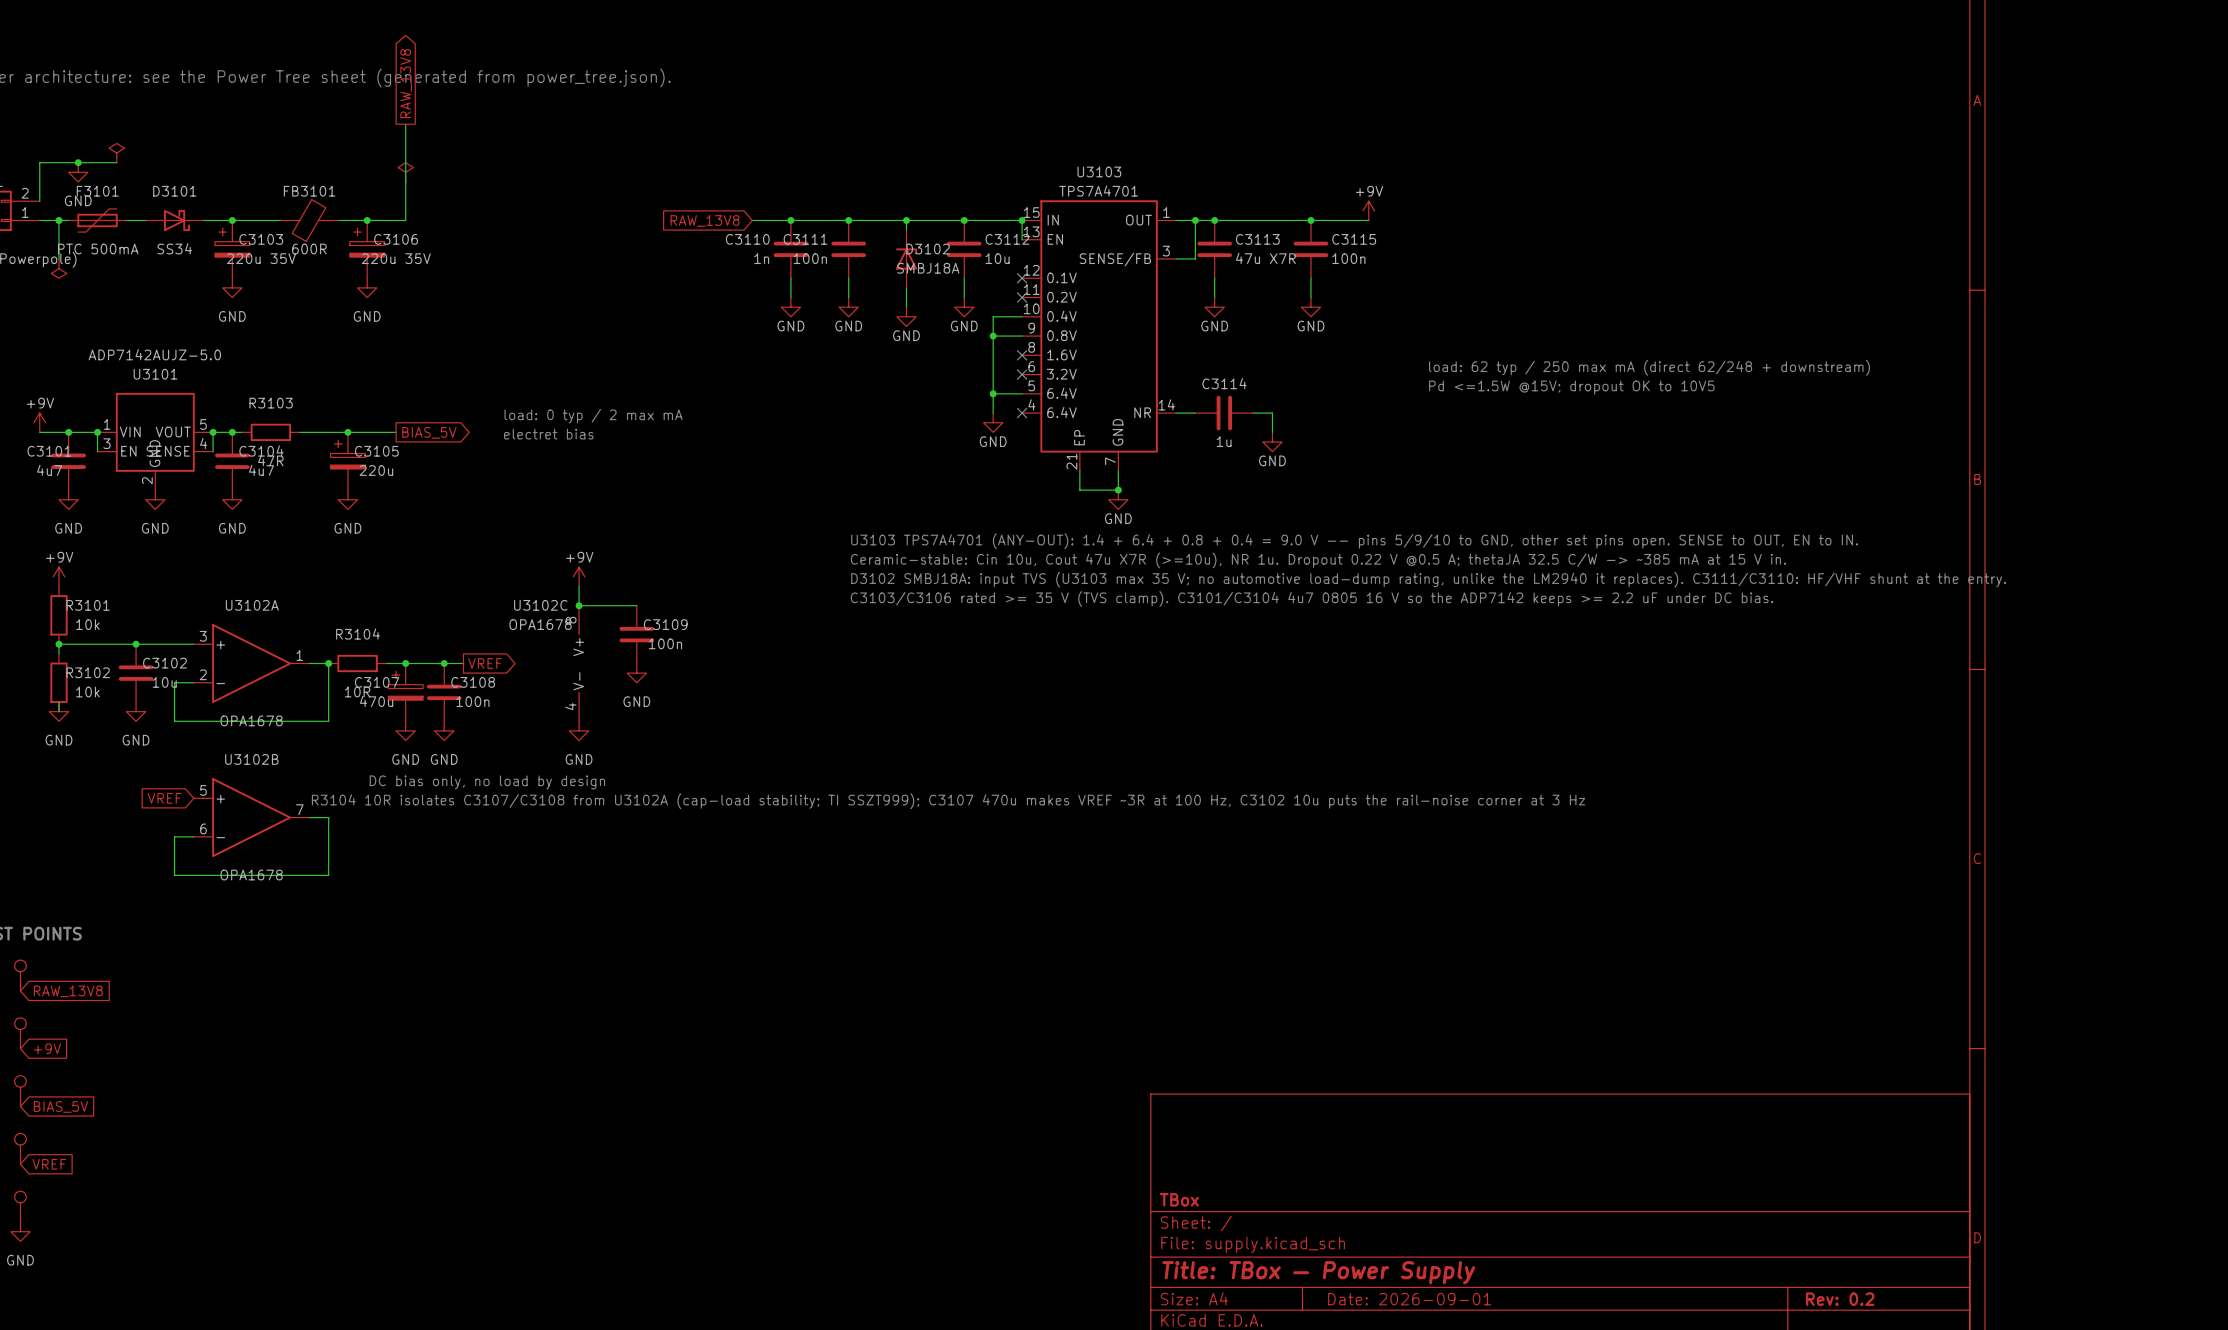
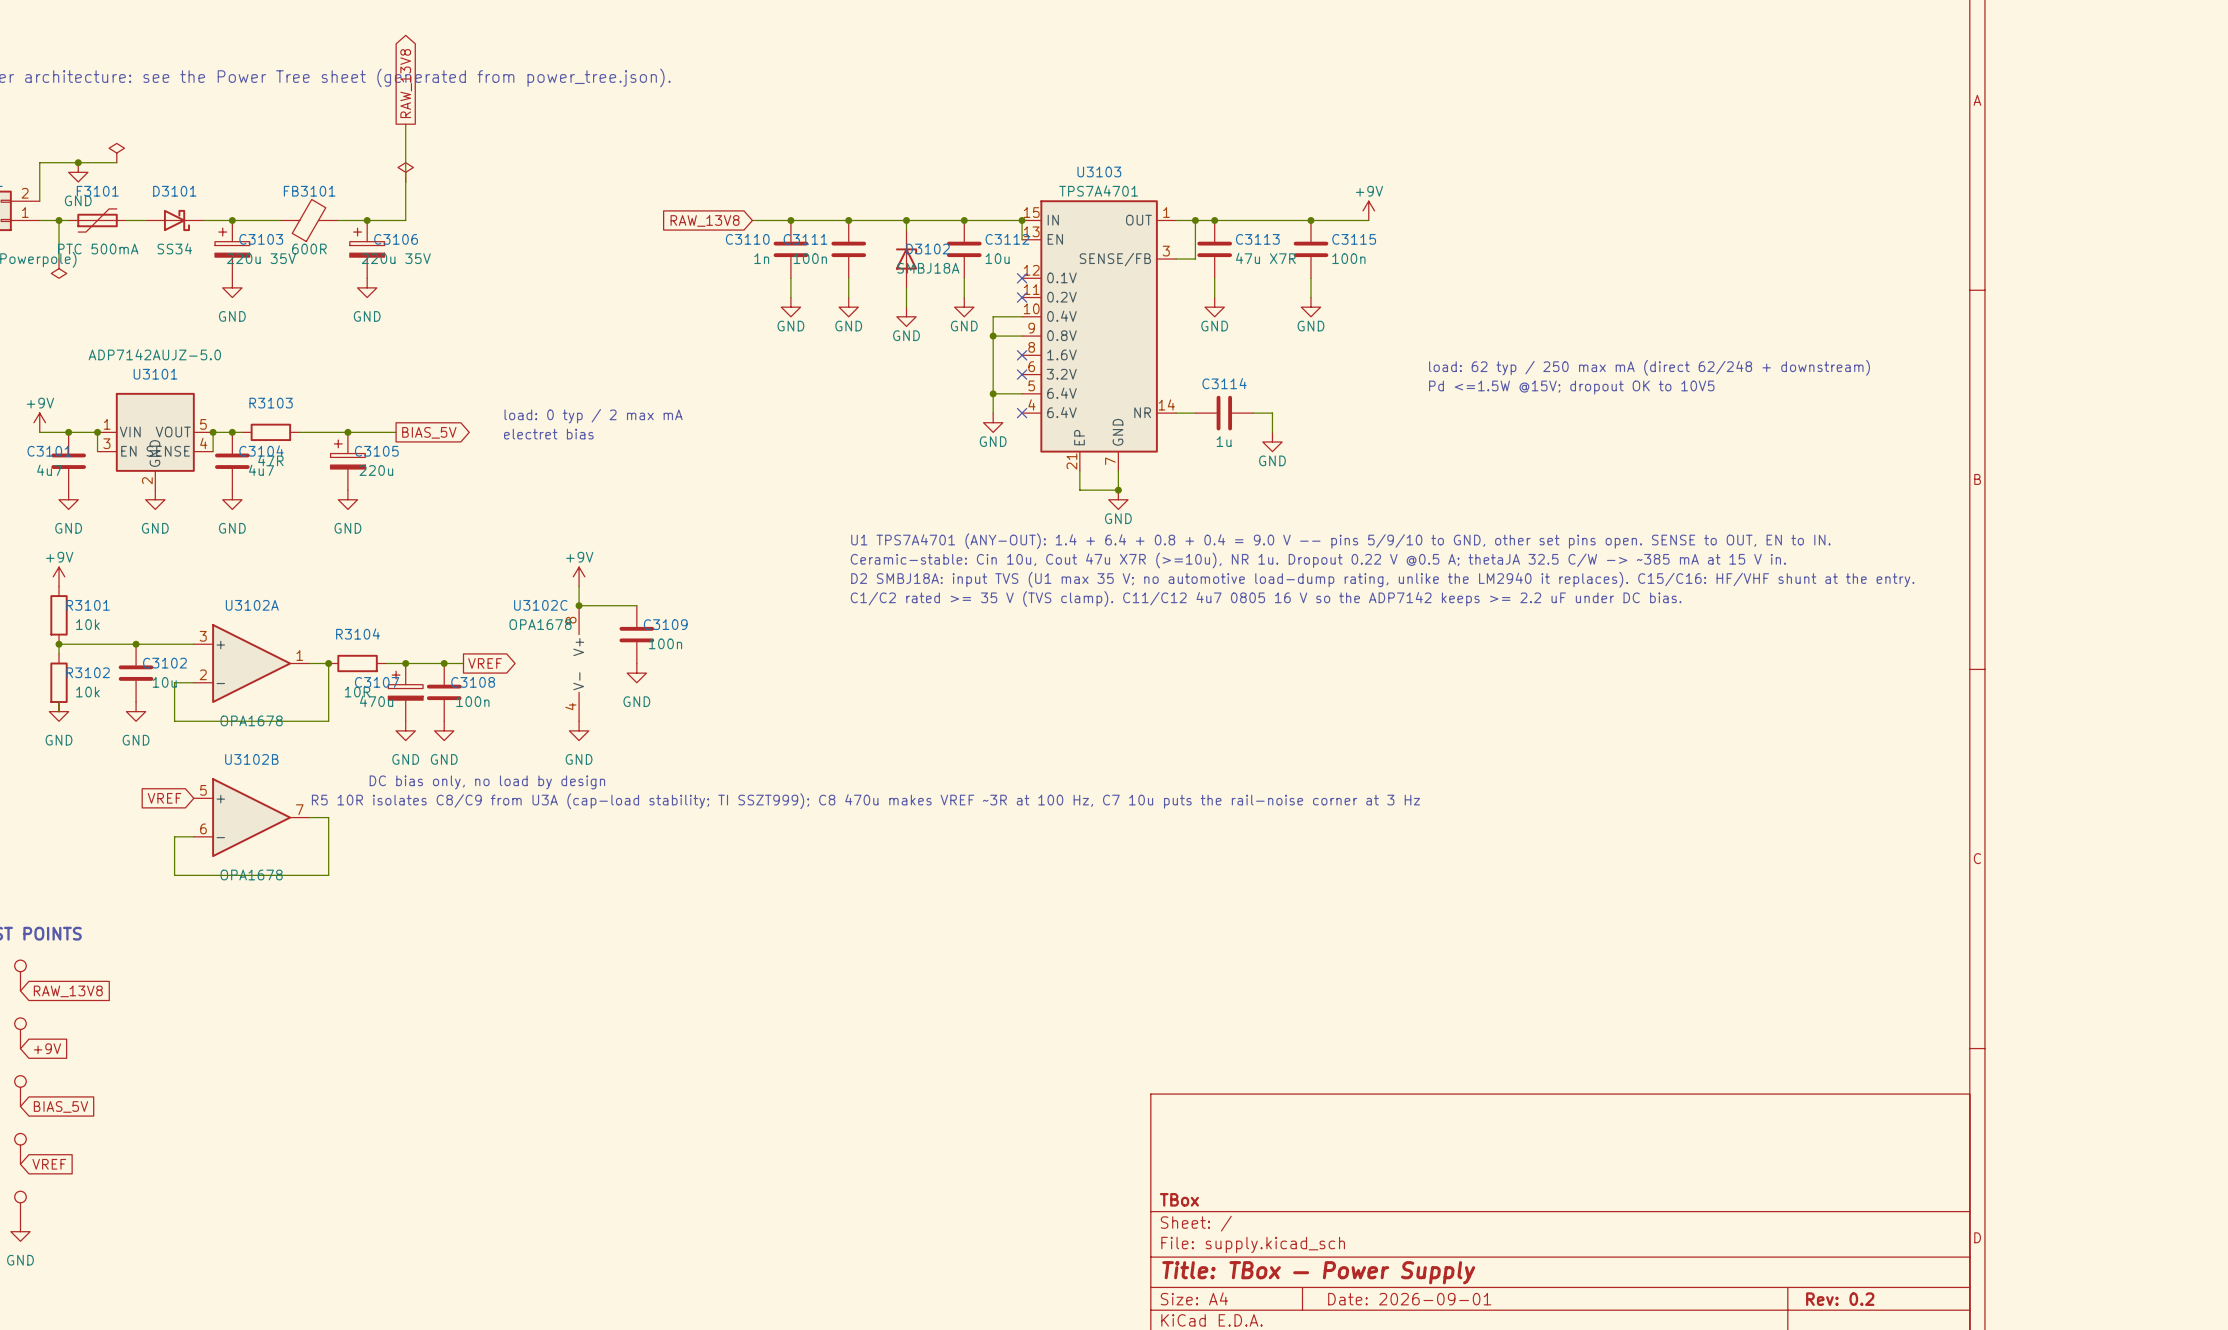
text: U3103 TPS7A4701 (ANY-OUT): 1.4 + 6.4 + 0.8 + 0.4 = 9.0 V -- pins 5/9/10 to GND, other set pins open. SENSE to OUT, EN to IN. (1354, 541) -> U1 TPS7A4701 (ANY-OUT): 1.4 + 6.4 + 0.8 + 0.4 = 9.0 V -- pins 5/9/10 to GND, other set pins open. SENSE to OUT, EN to IN. (1340, 541)
text: D3102 SMBJ18A: input TVS (U3103 max 35 V; no automotive load-dump rating, unlike the LM2940 it replaces). C3111/C3110: HF/VHF shunt at the entry. (1428, 579) -> D2 SMBJ18A: input TVS (U1 max 35 V; no automotive load-dump rating, unlike the LM2940 it replaces). C15/C16: HF/VHF shunt at the entry. (1382, 579)
text: C3103/C3106 rated >= 35 V (TVS clamp). C3101/C3104 4u7 0805 16 V so the ADP7142 keeps >= 2.2 uF under DC bias. (1311, 598) -> C1/C2 rated >= 35 V (TVS clamp). C11/C12 4u7 0805 16 V so the ADP7142 keeps >= 2.2 uF under DC bias. (1266, 598)
text: R3104 10R isolates C3107/C3108 from U3102A (cap-load stability; TI SSZT999); C3107 470u makes VREF ~3R at 100 Hz, C3102 10u puts the rail-noise corner at 3 Hz (948, 801) -> R5 10R isolates C8/C9 from U3A (cap-load stability; TI SSZT999); C8 470u makes VREF ~3R at 100 Hz, C7 10u puts the rail-noise corner at 3 Hz (865, 801)

